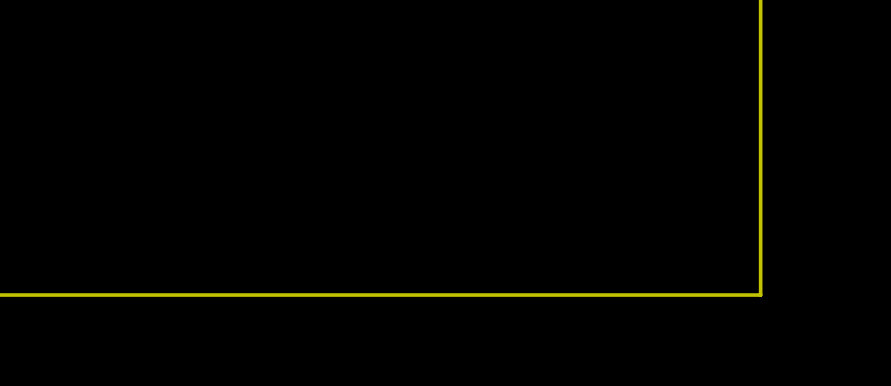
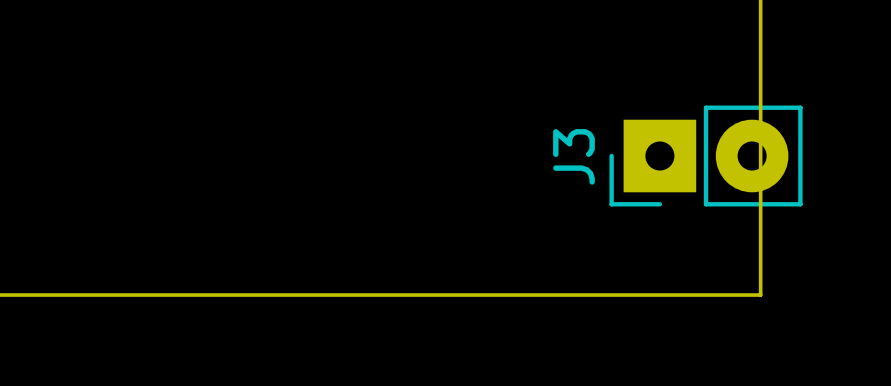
J3: none -> (706, 156)

